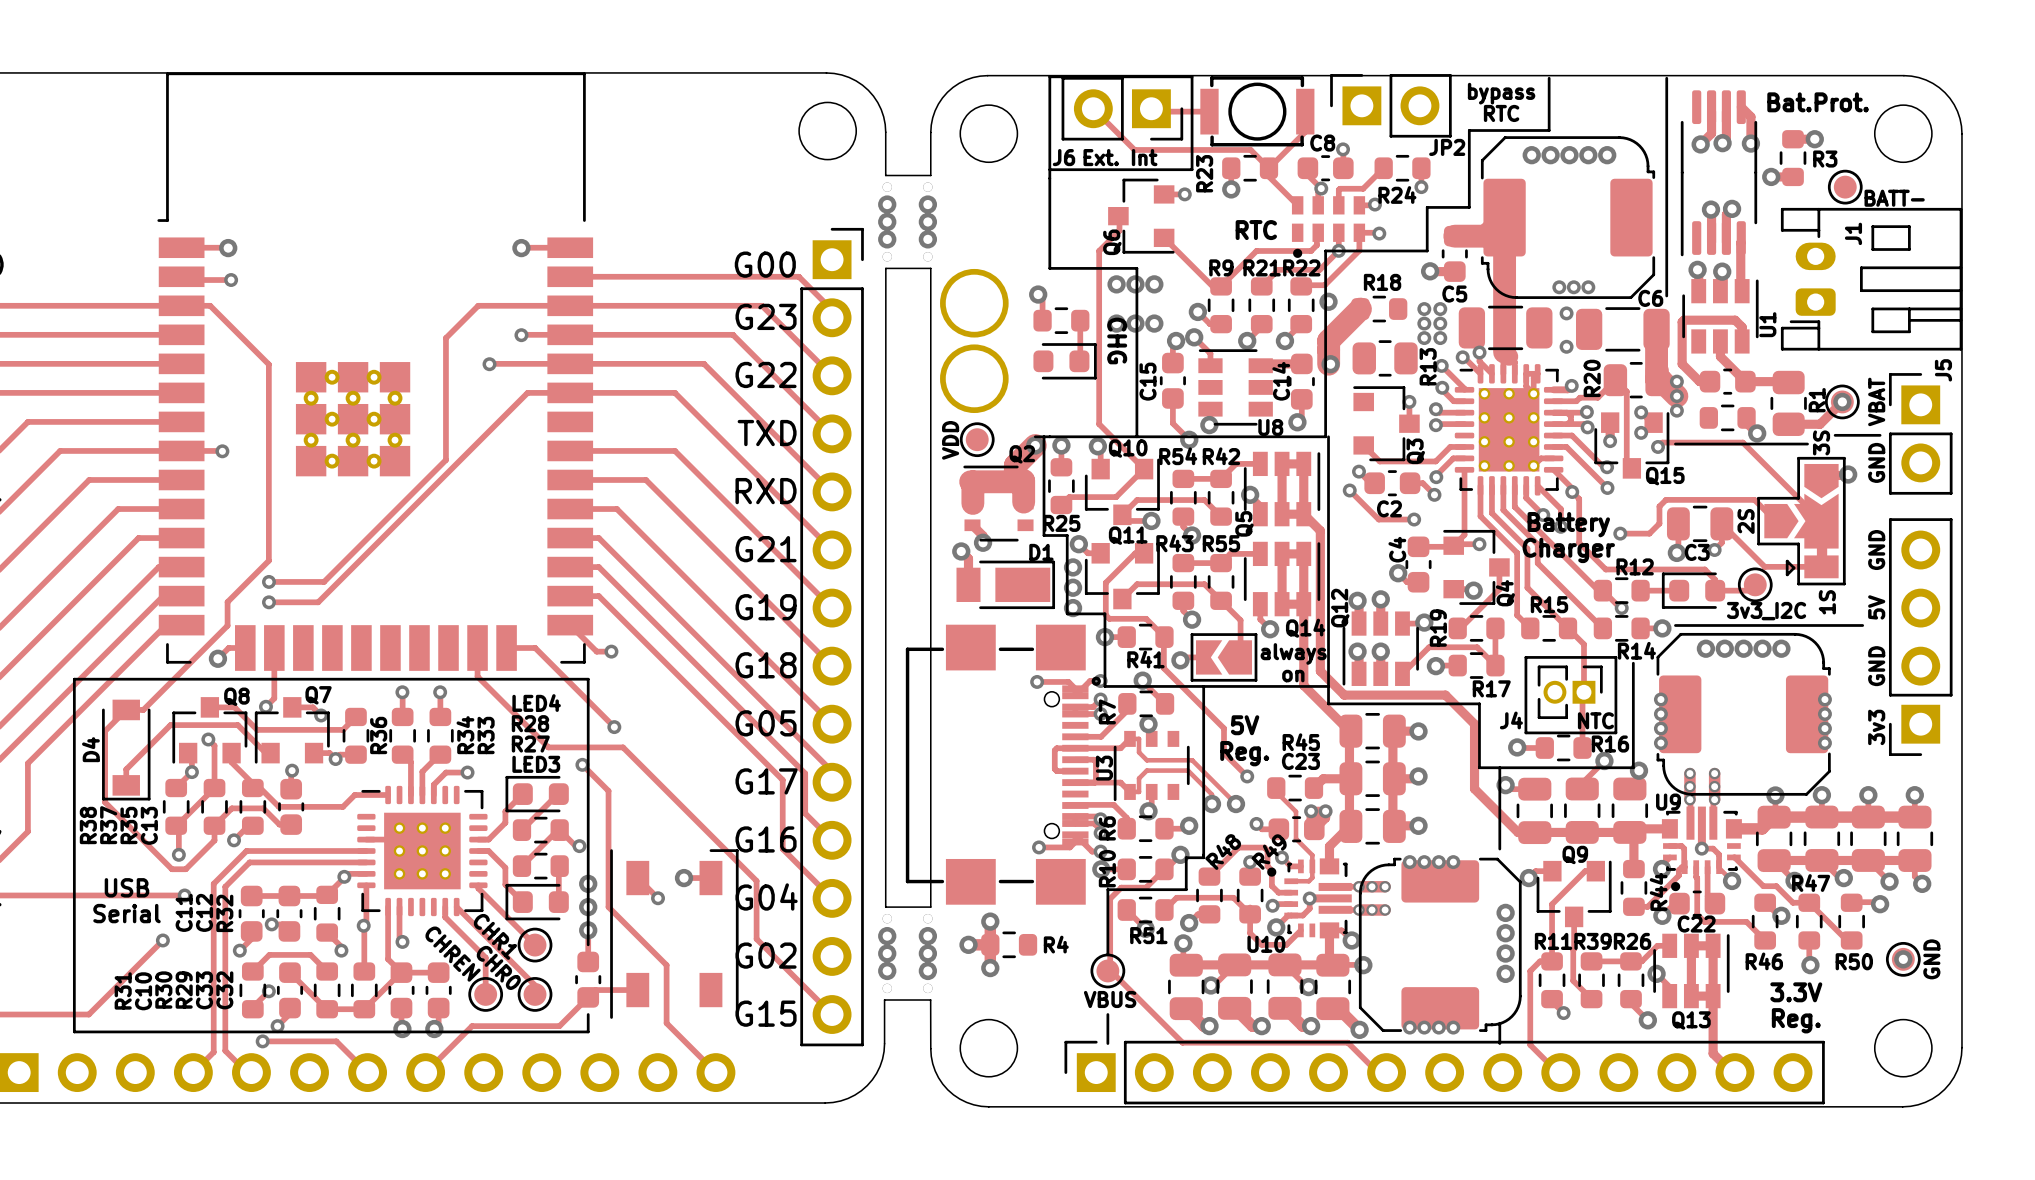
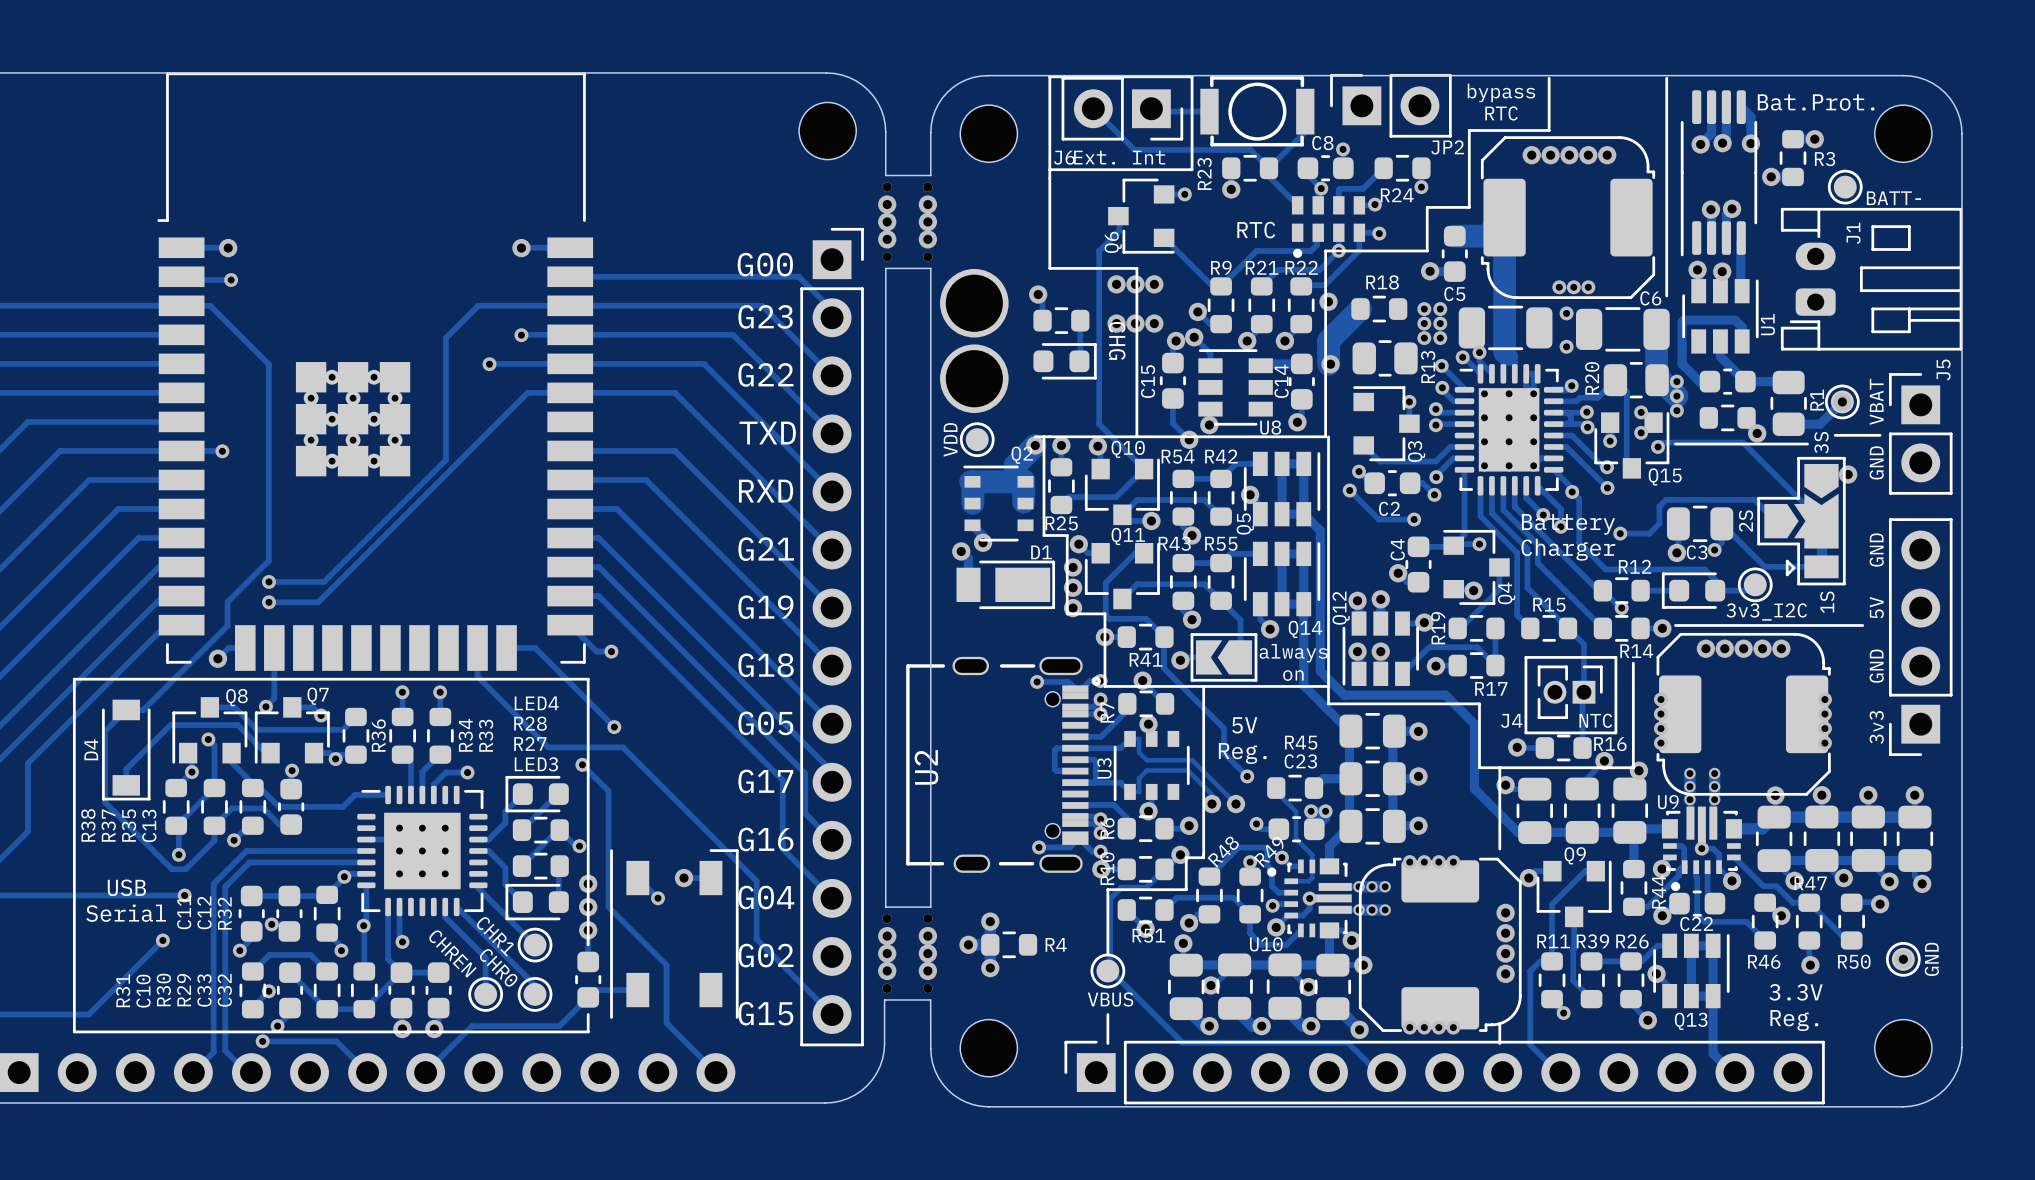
part: (1003, 764) -> none
U2: none -> (1003, 764)

